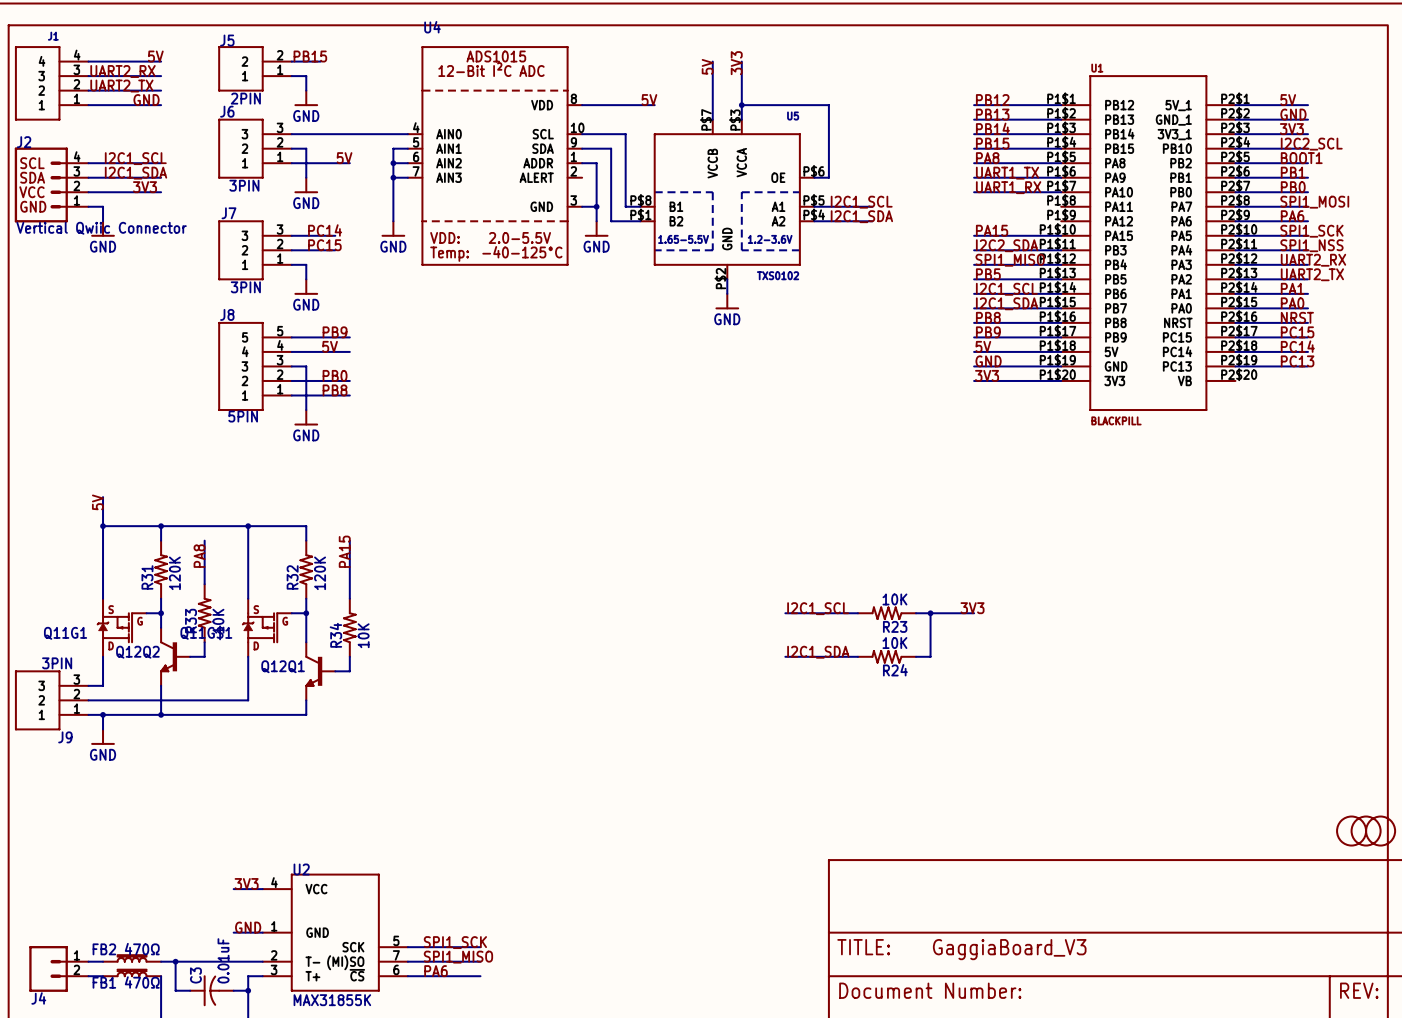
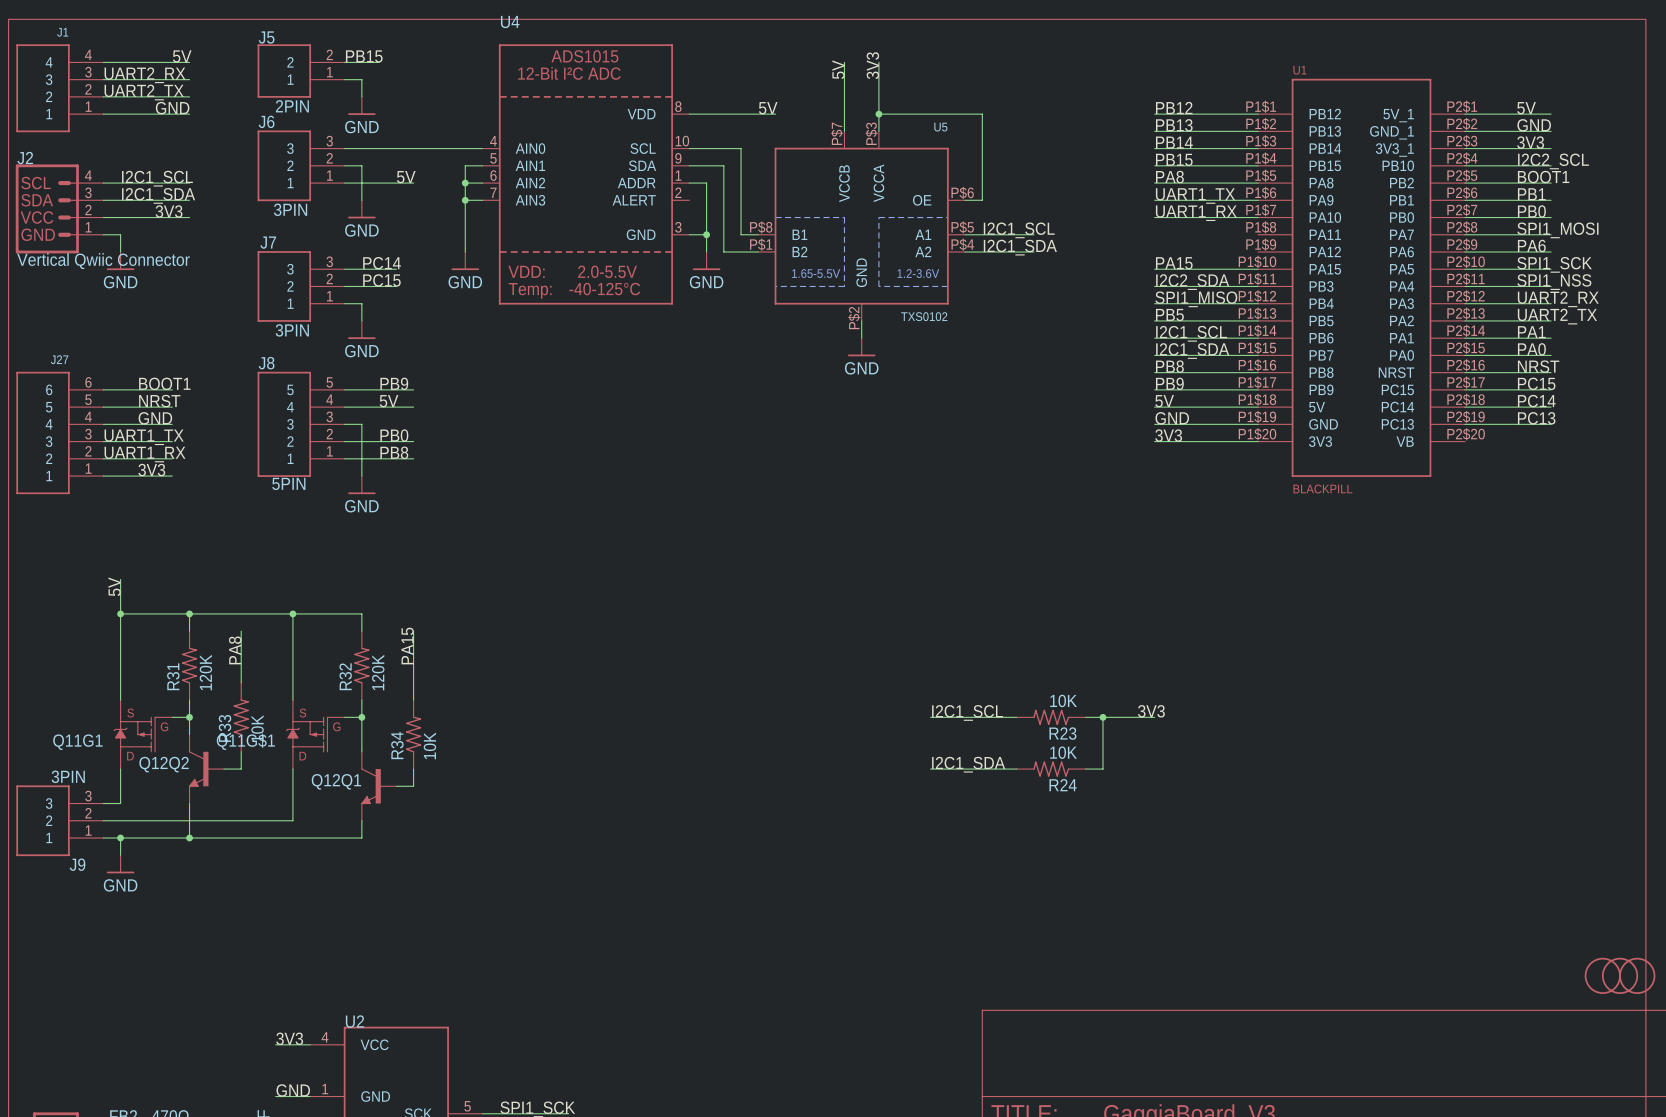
label: none -> BOOT1 (164, 383)
wire: none -> (103, 389) (172, 389)
label: none -> NRST (159, 401)
wire: none -> (103, 407) (172, 407)
label: none -> GND (155, 418)
wire: none -> (103, 424) (172, 424)
J27: none -> (59, 432)
label: none -> UART1_TX (144, 437)
wire: none -> (103, 441) (172, 441)
label: none -> UART1_RX (145, 454)
wire: none -> (103, 458) (172, 458)
label: none -> 3V3 (151, 470)
wire: none -> (103, 476) (172, 476)

